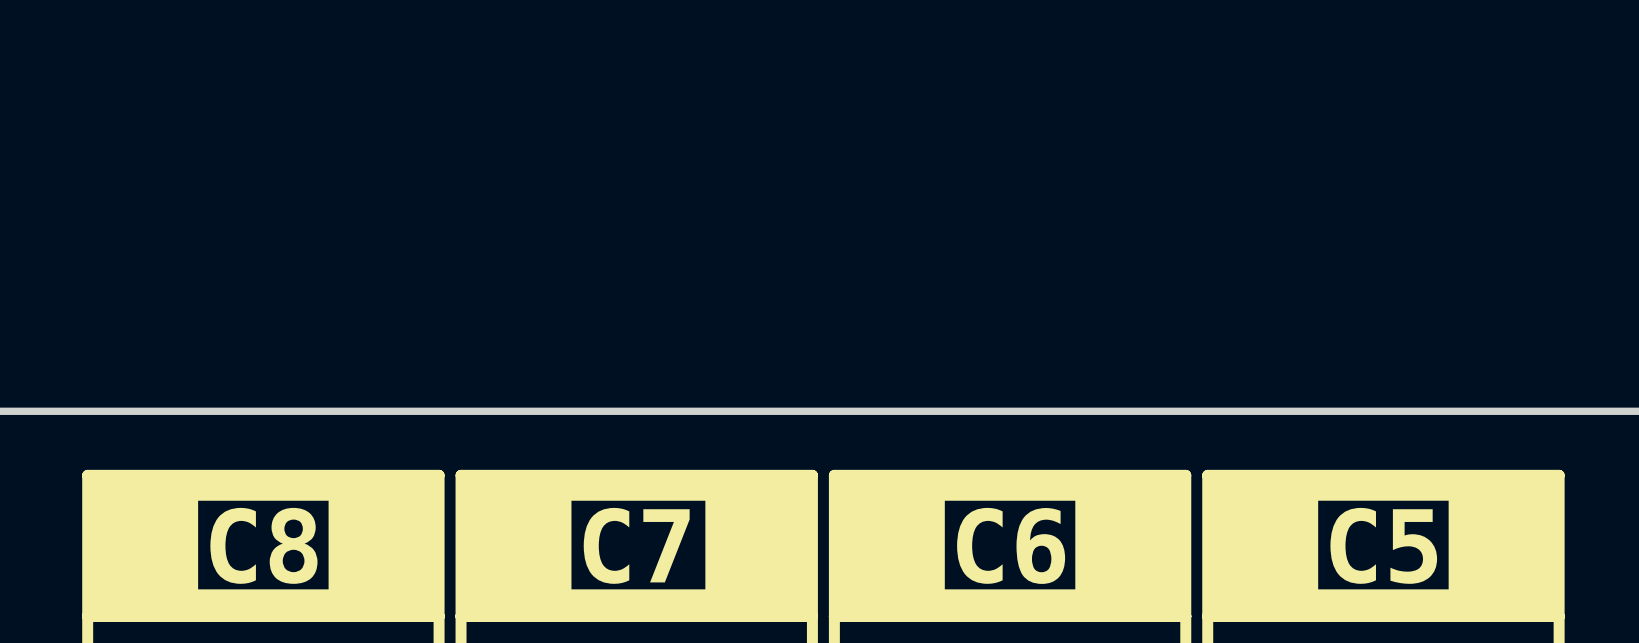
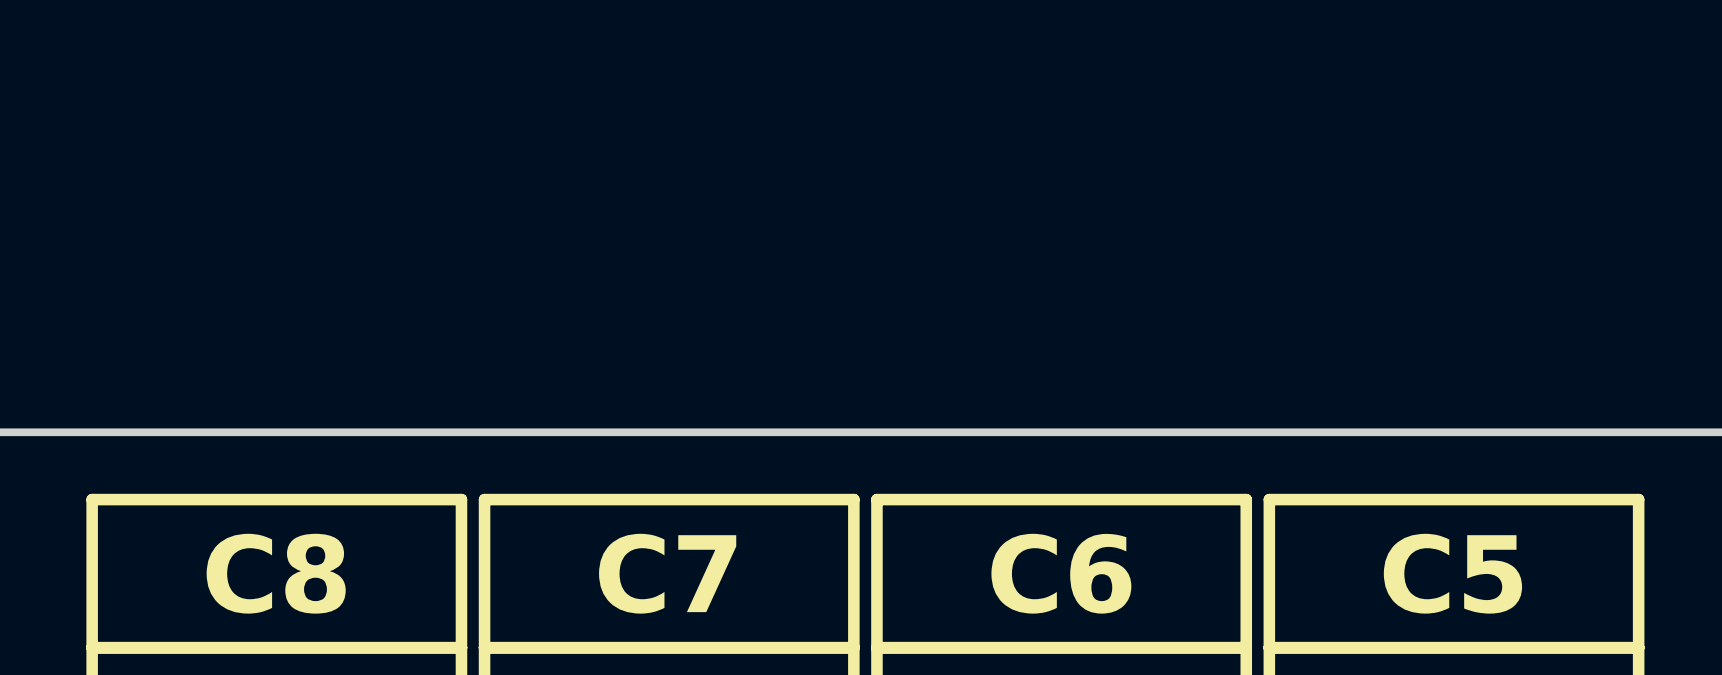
drawing: [87, 475, 1560, 617] -> none

